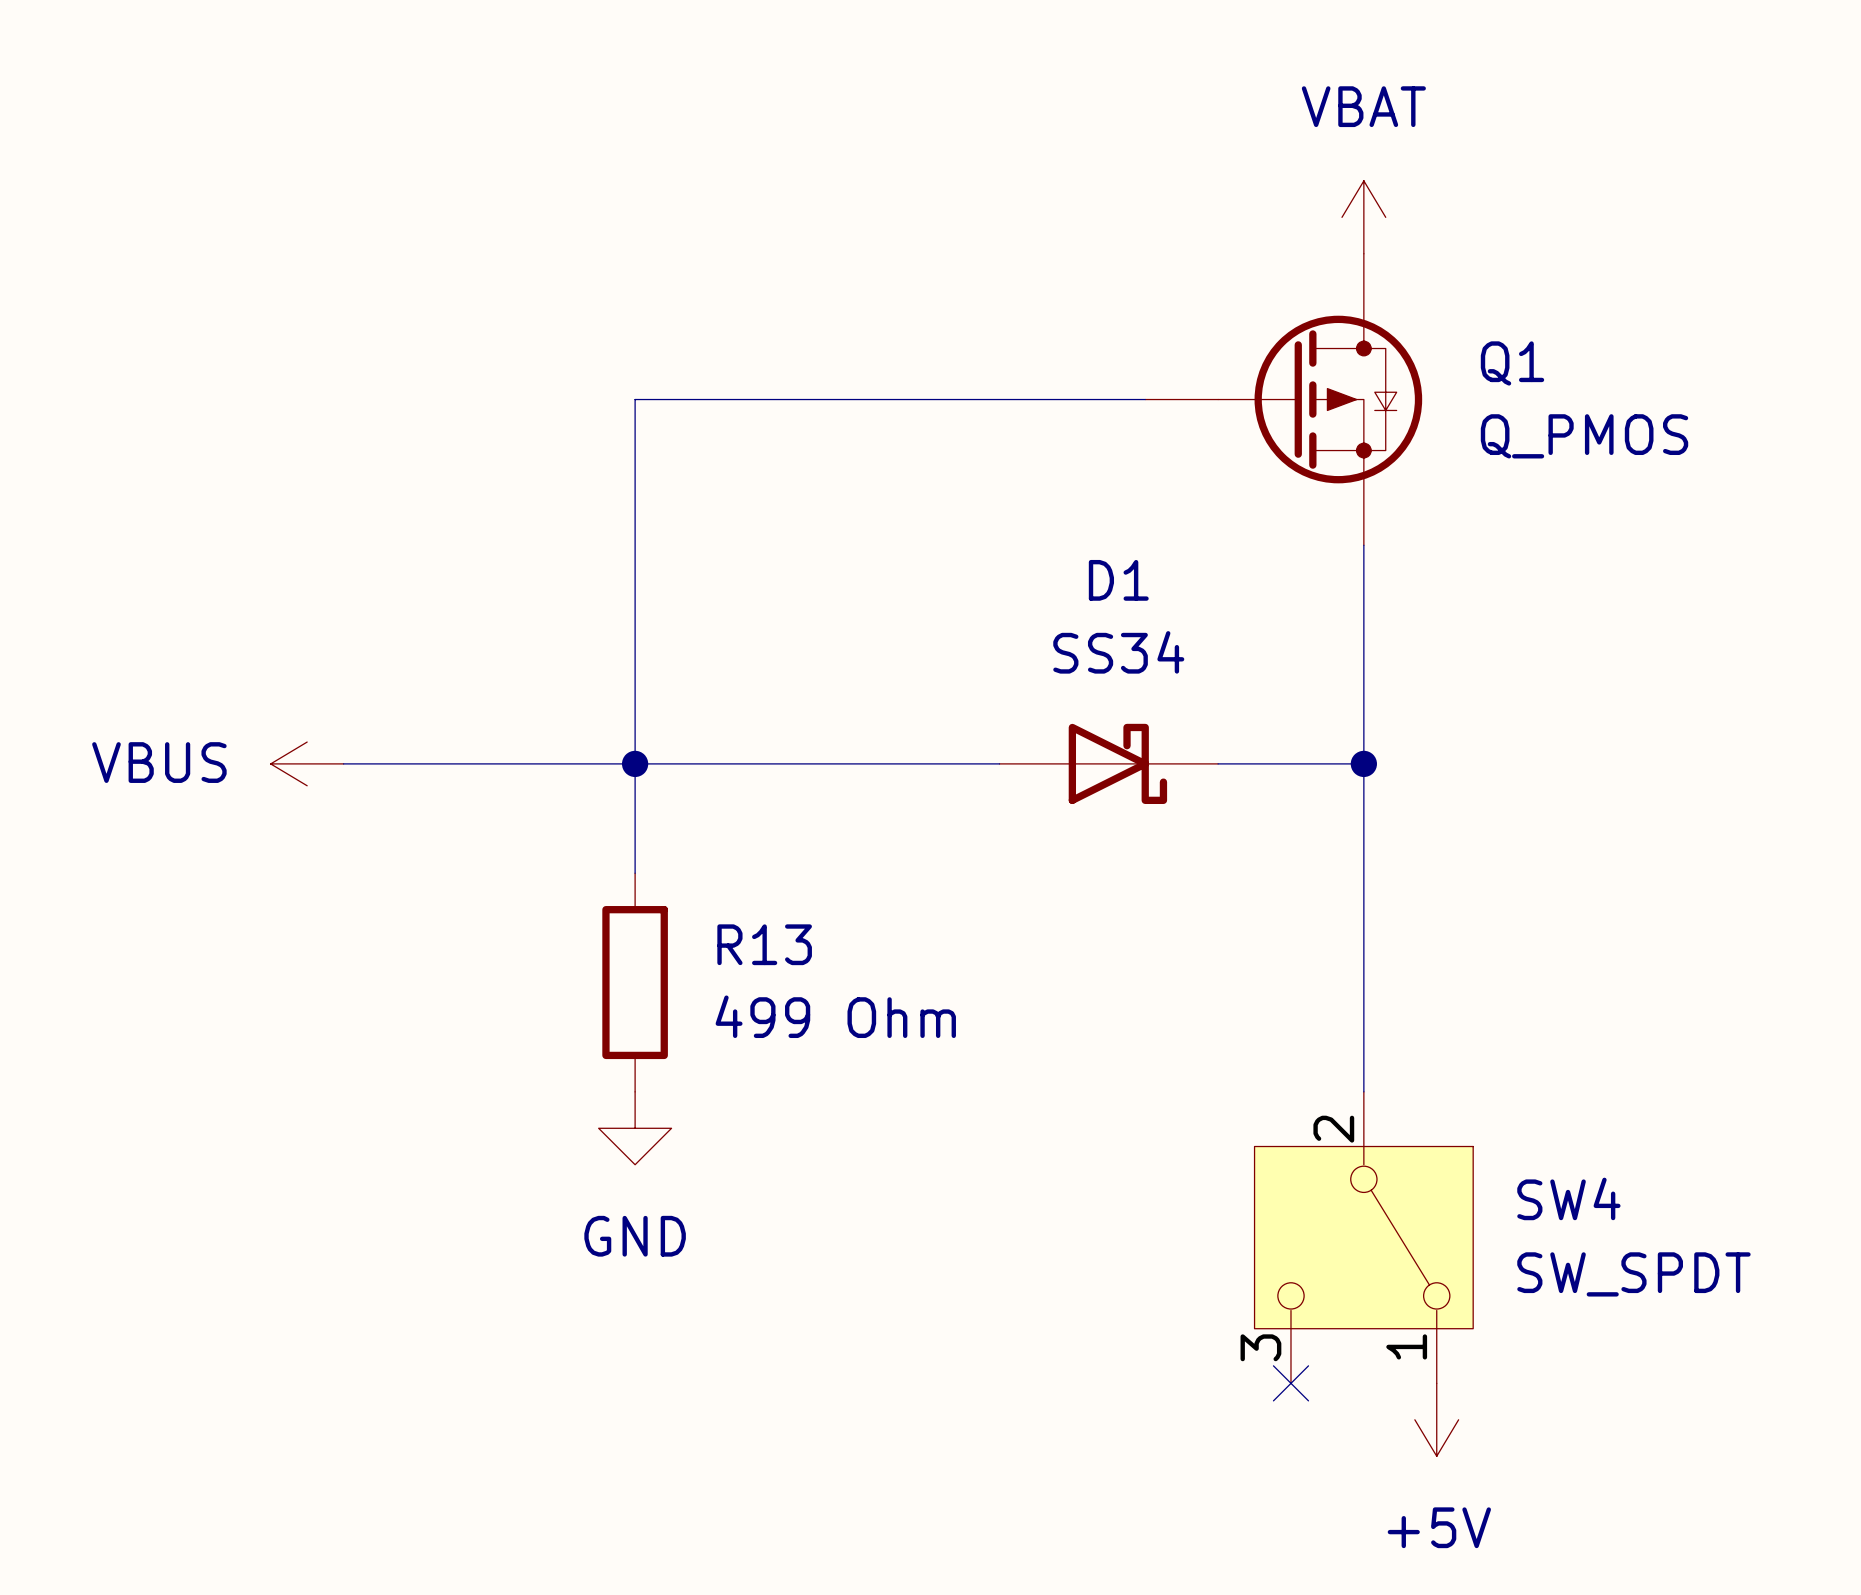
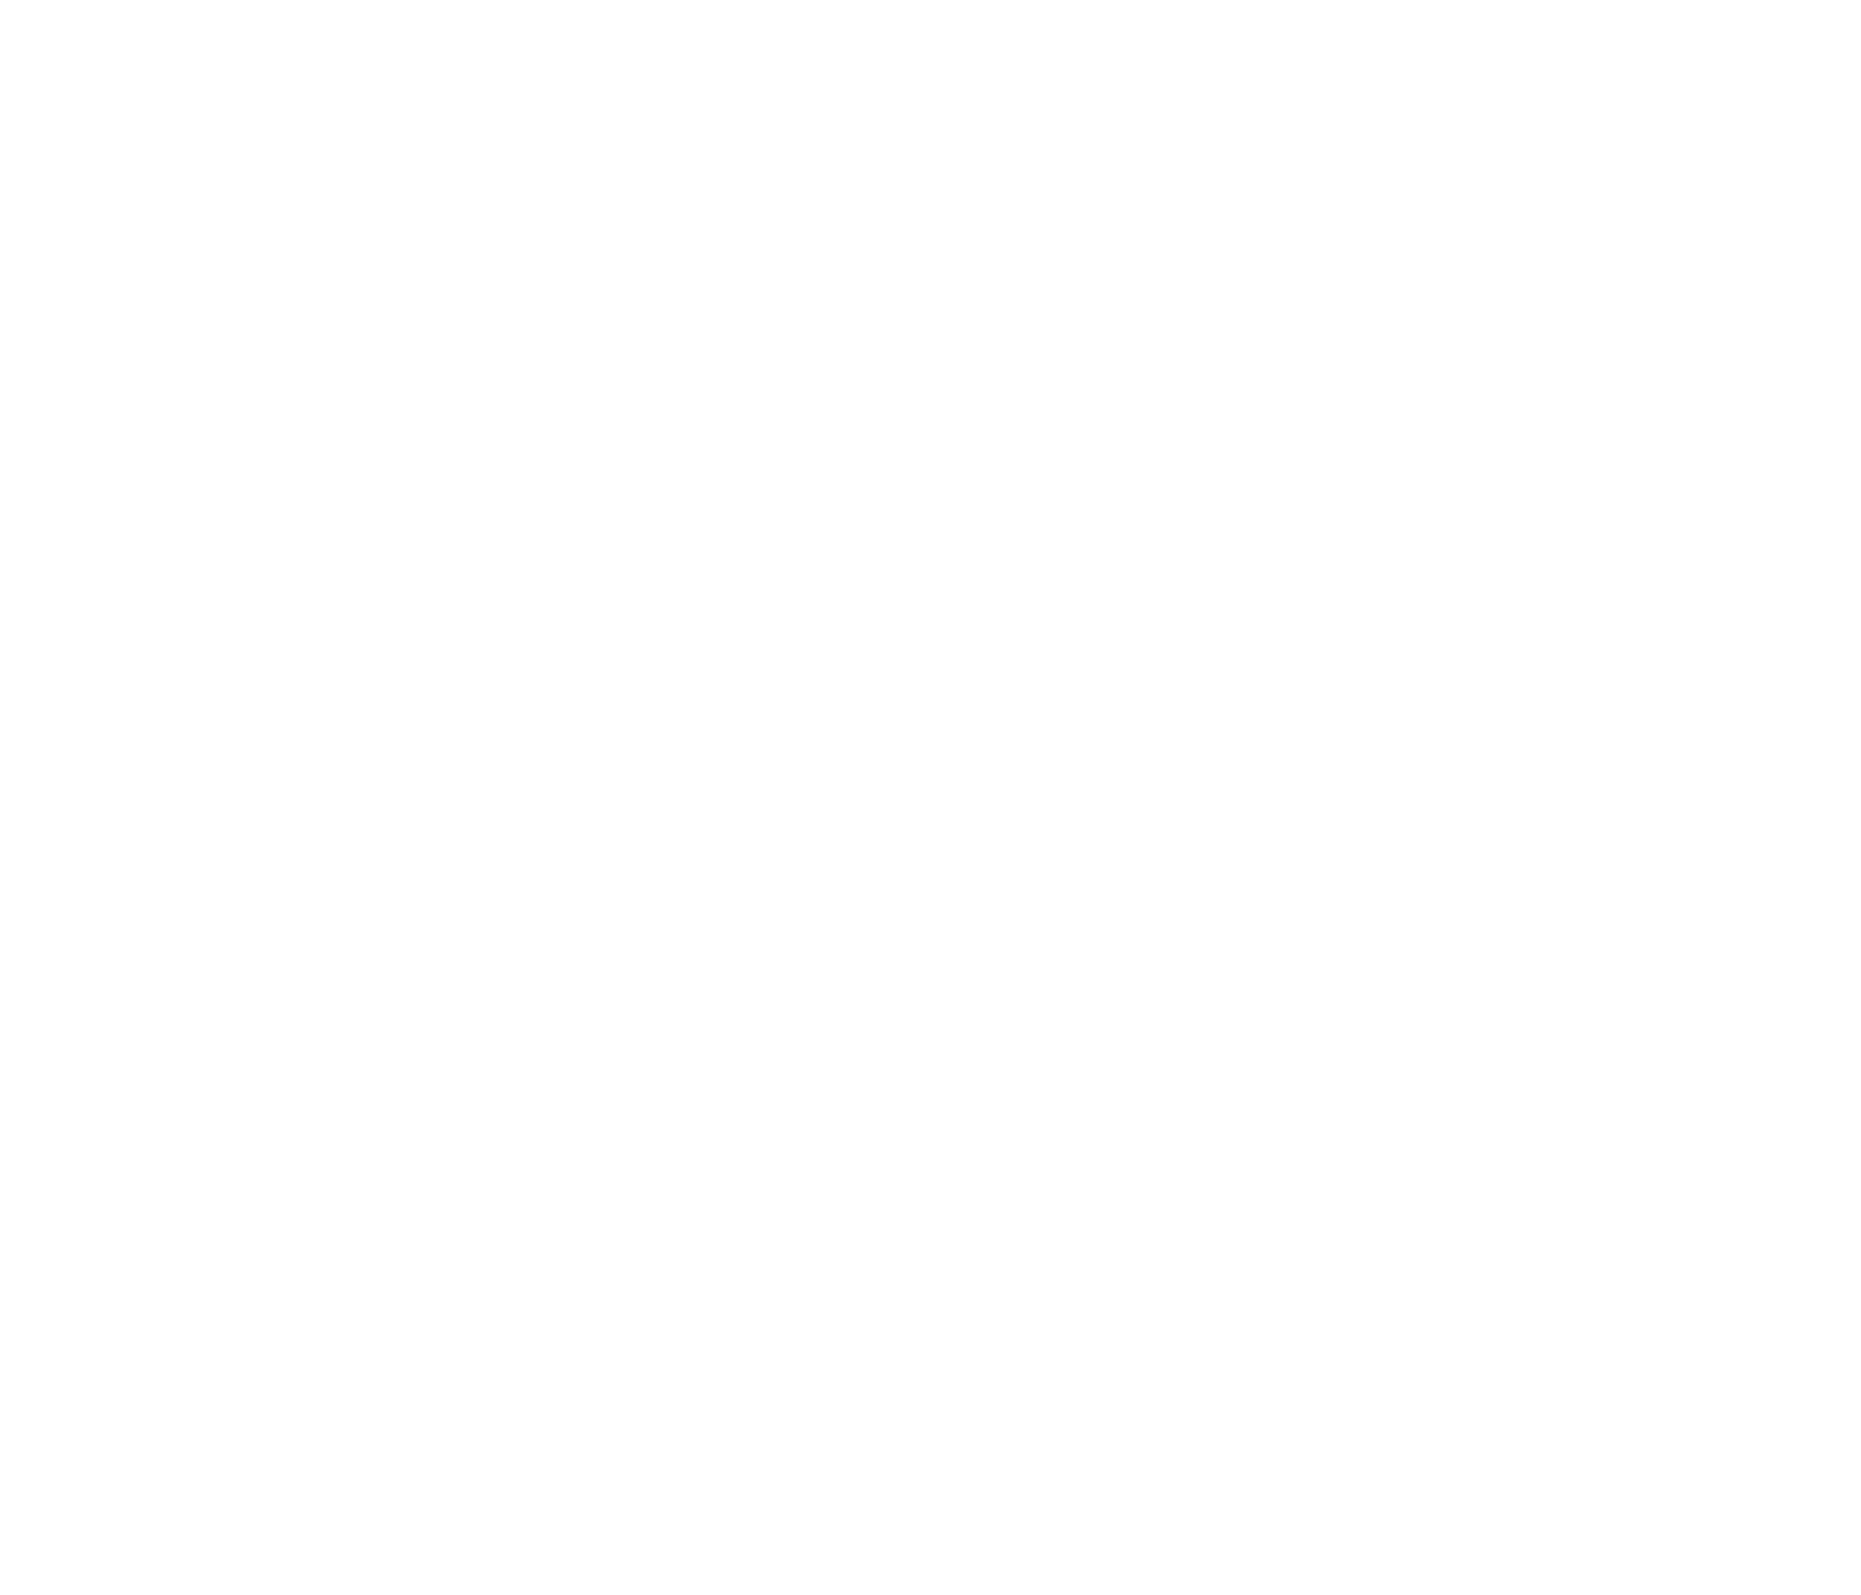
power symbol: VBAT (1363, 217) -> none
wire: (1145, 399) (635, 399) (635, 873) -> none
Q1: Q_PMOS (1283, 399) -> none
wire: (1363, 545) (1363, 1091) -> none
power symbol: VBUS (307, 763) -> none
wire: (343, 763) (999, 763) -> none
junction: (635, 763) -> none
D1: SS34 (1108, 763) -> none
wire: (1218, 763) (1363, 763) -> none
junction: (1363, 763) -> none
R13: 499 Ohm (635, 982) -> none
power symbol: GND (635, 1128) -> none
SW4: SW_SPDT (1363, 1237) -> none
no-connect mark: (1290, 1383) -> none
power symbol: +5V (1436, 1419) -> none

